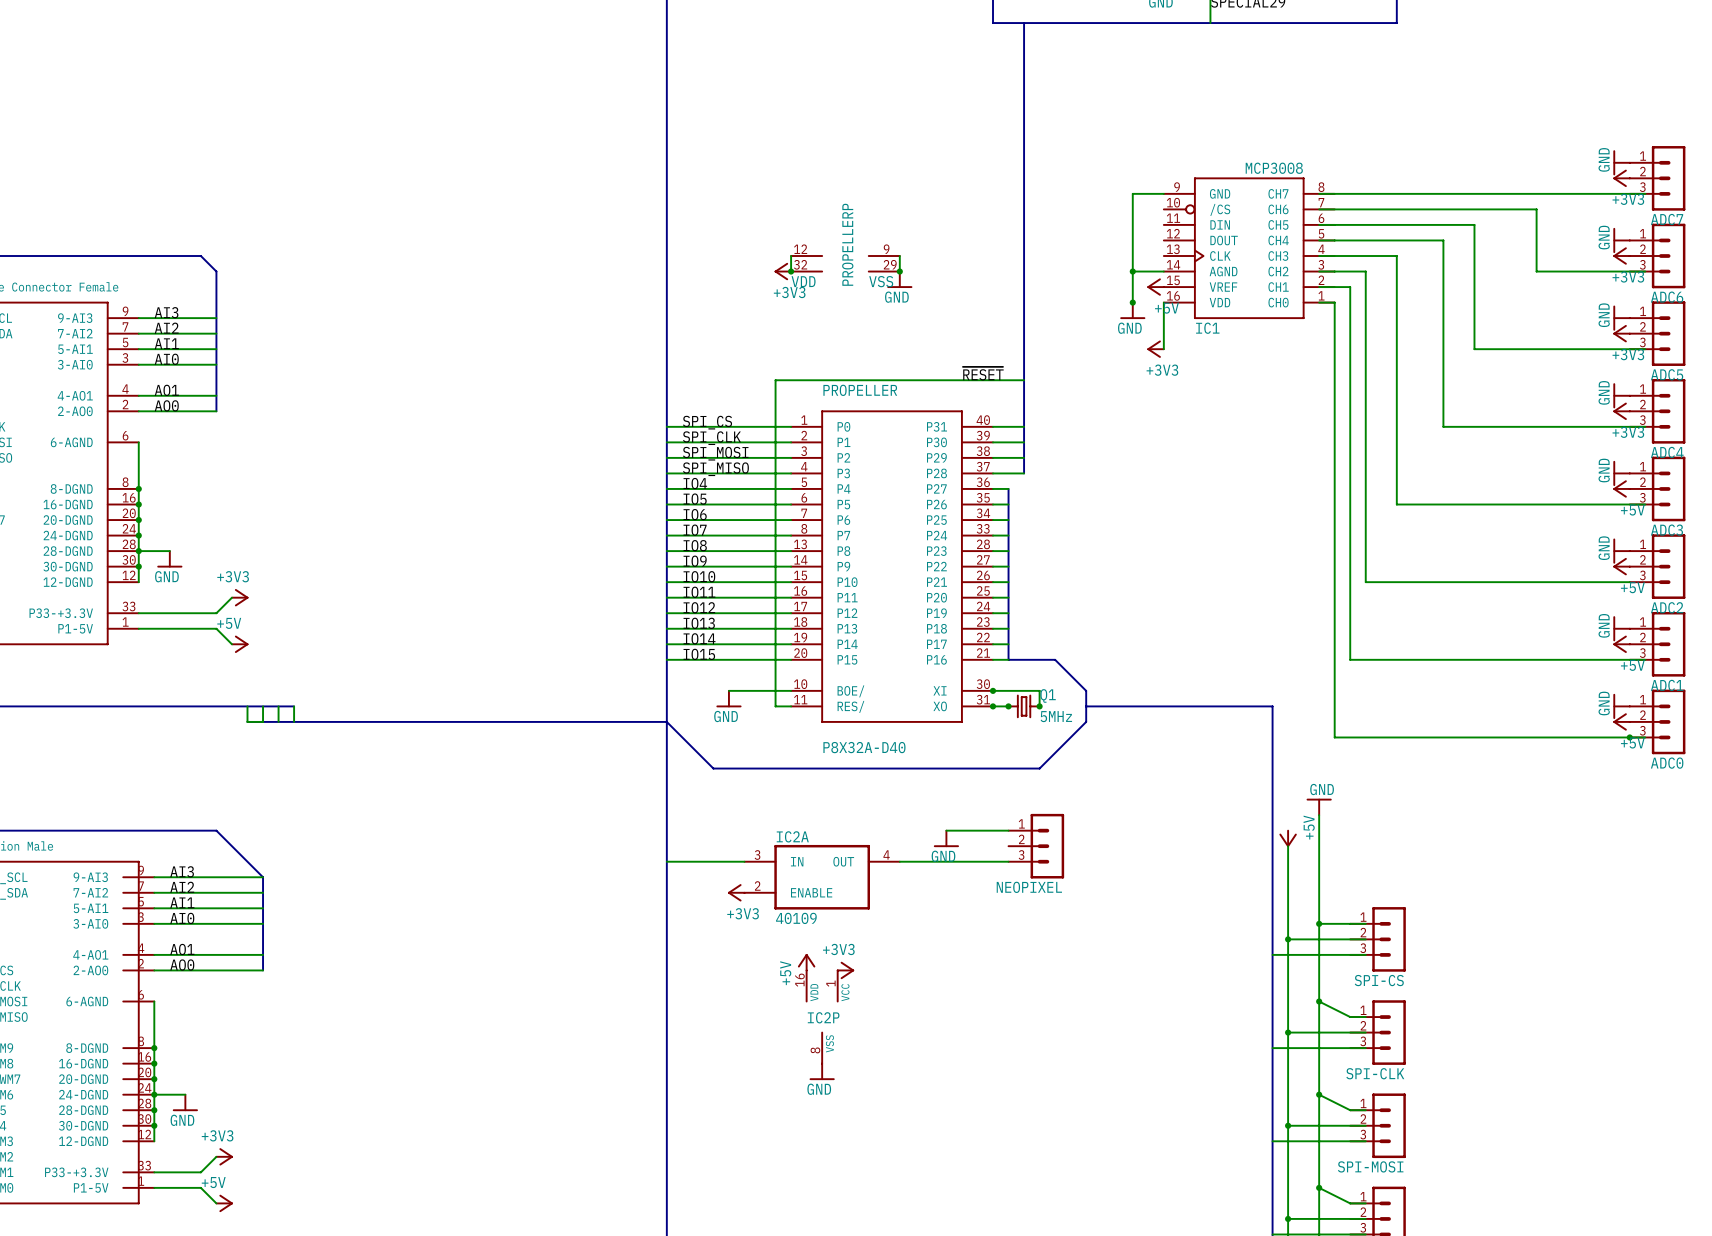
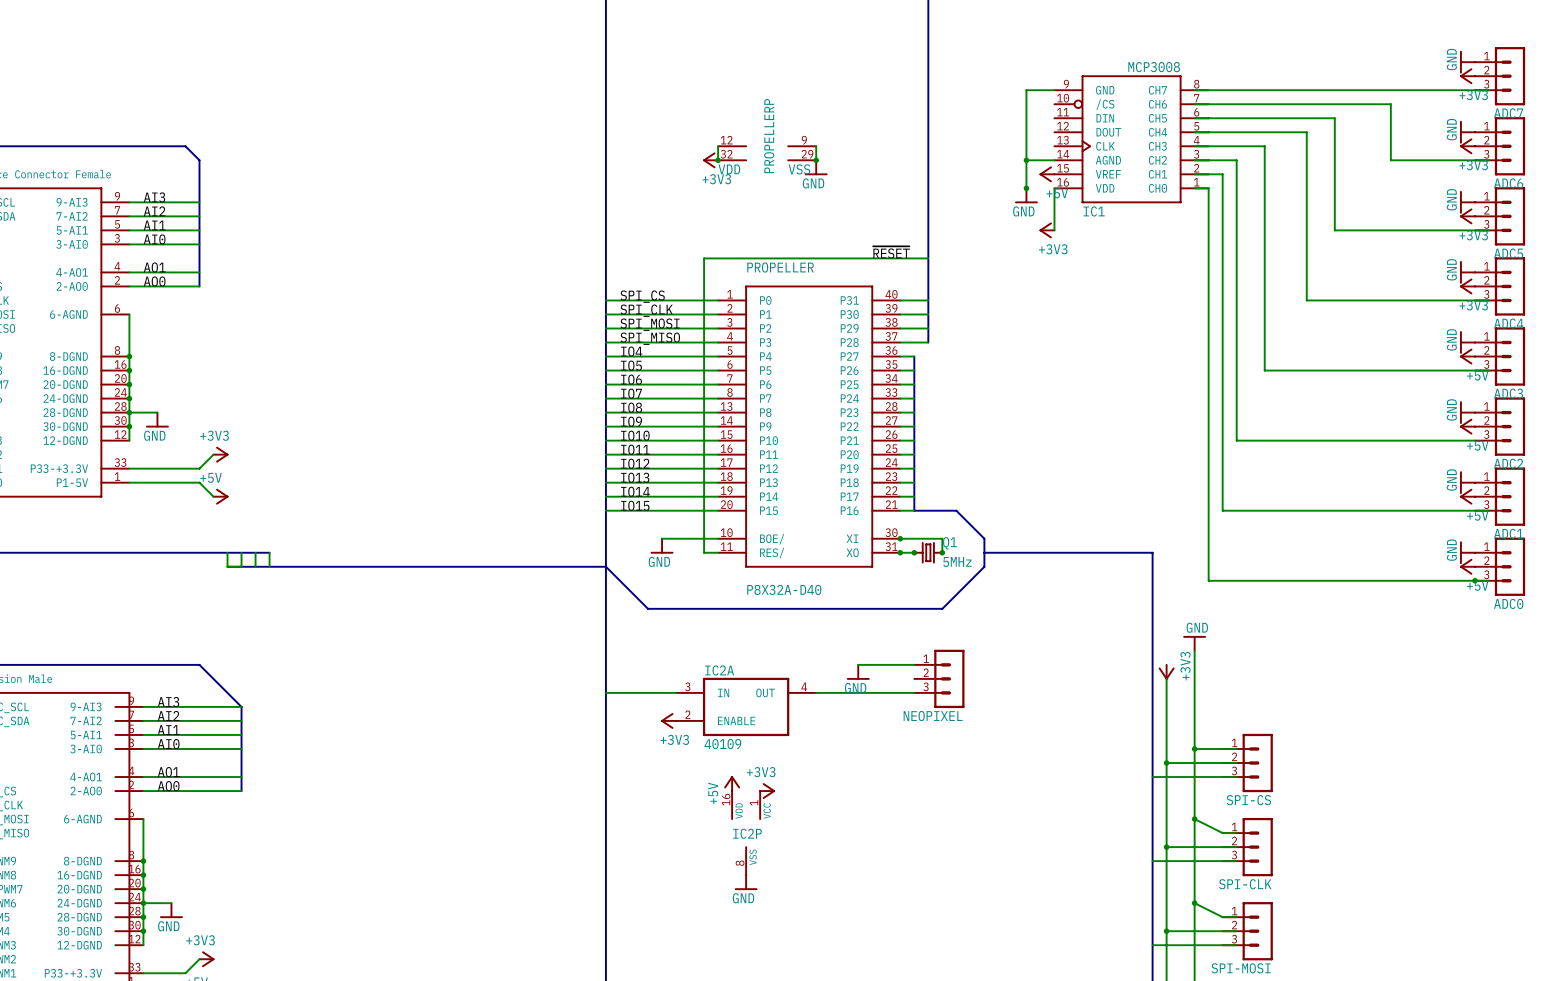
power symbol: +5V (1288, 838) -> +3V3 (1166, 672)

